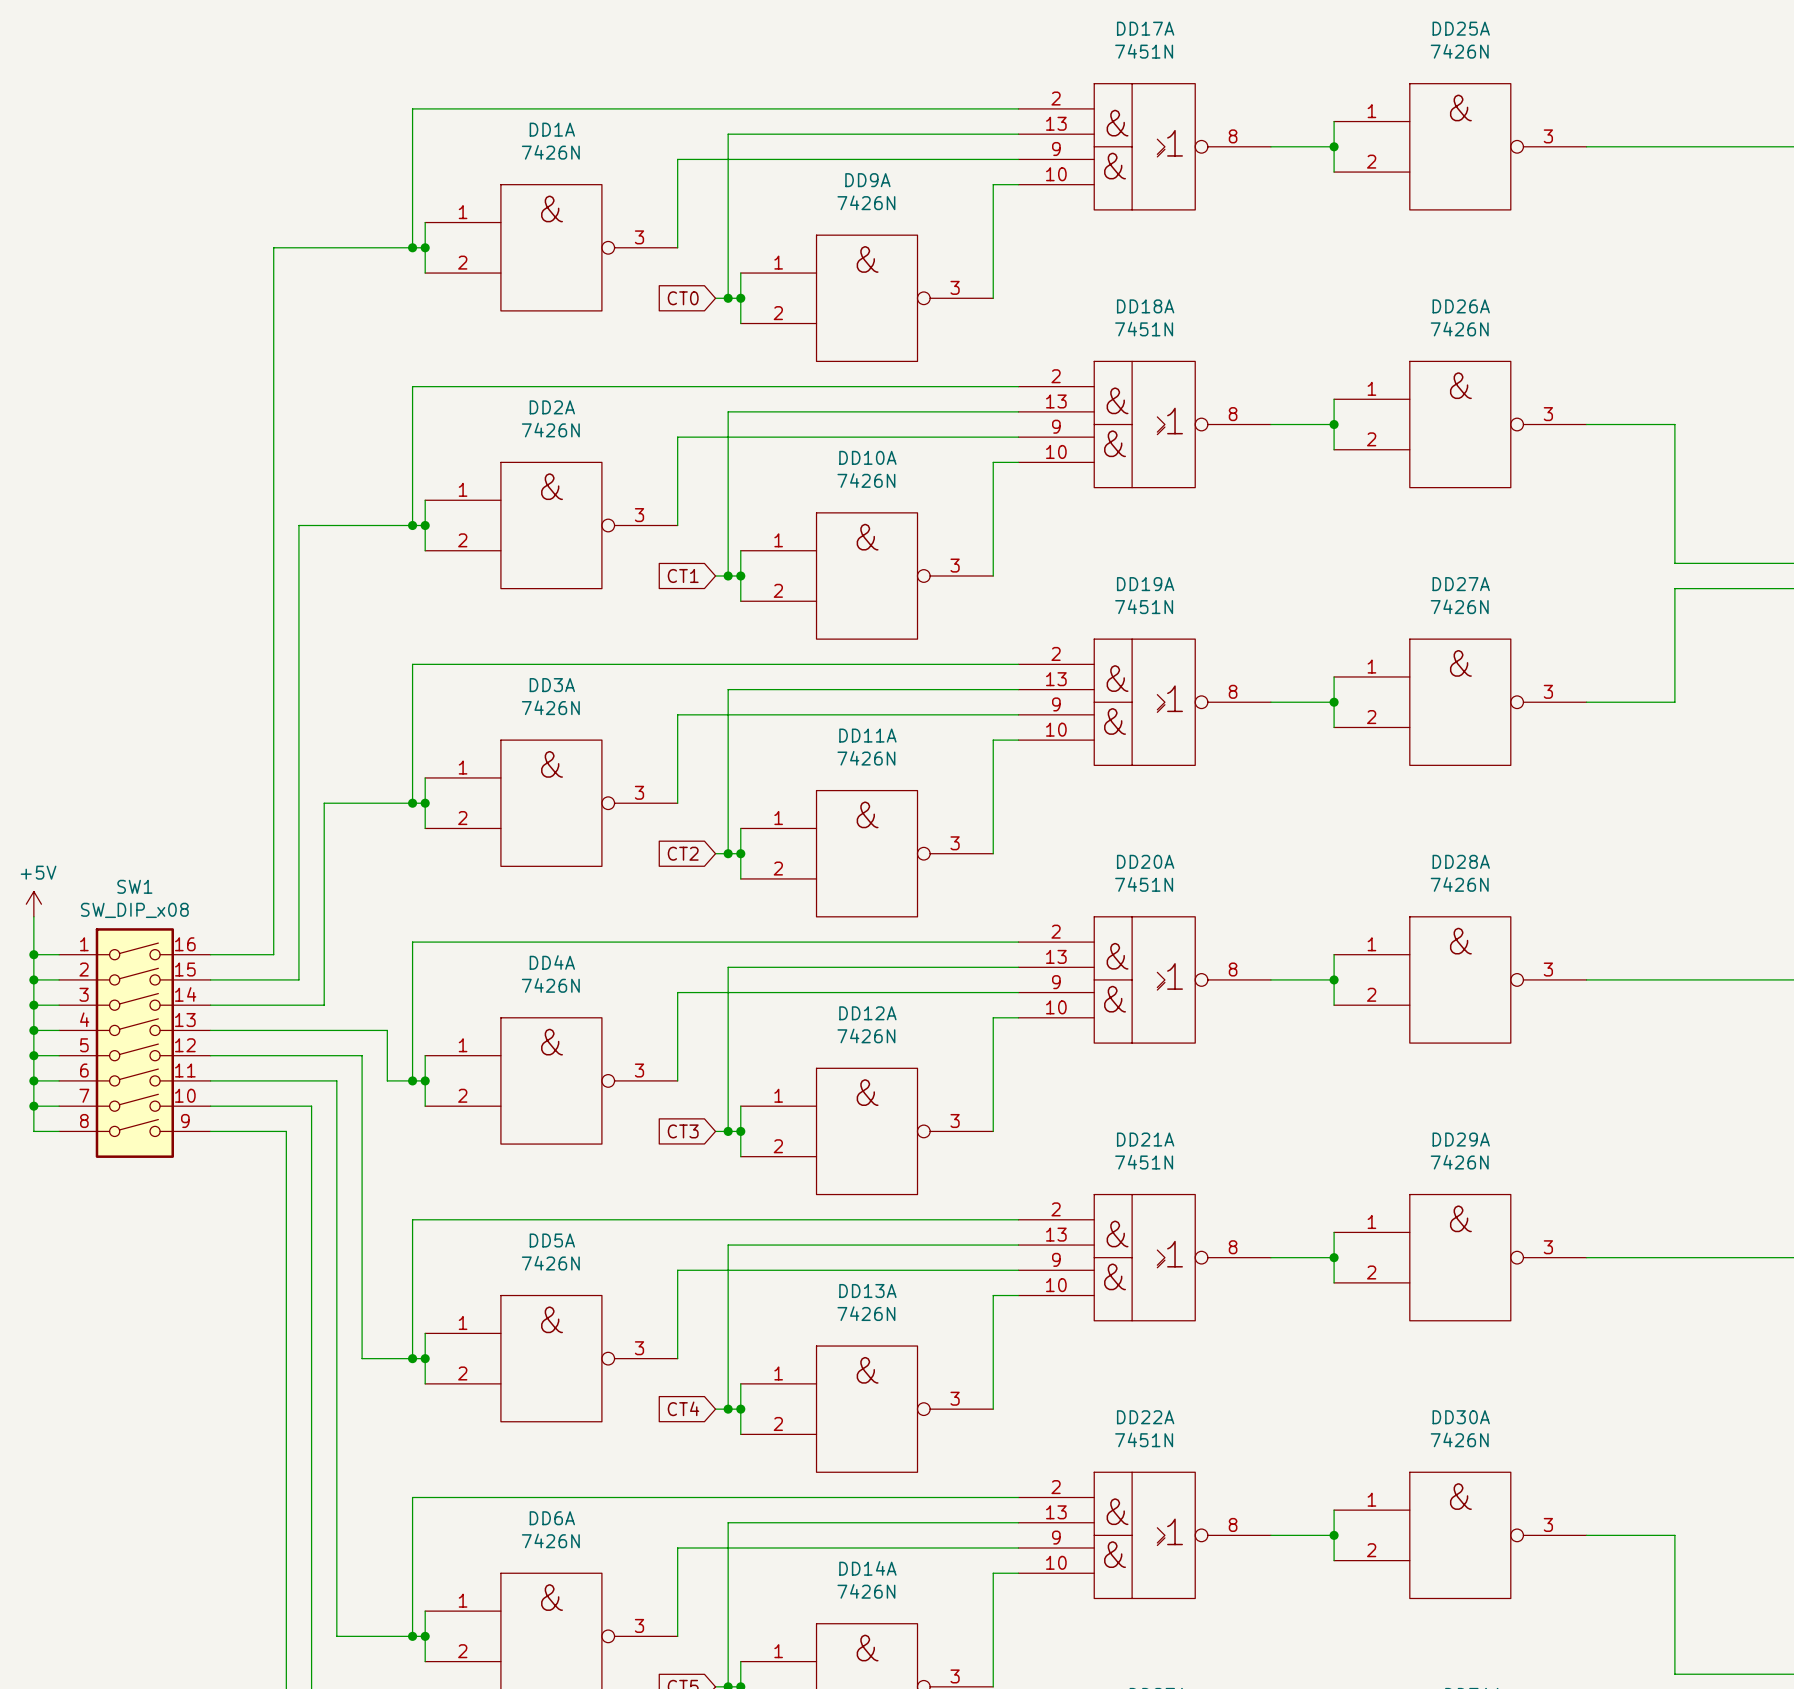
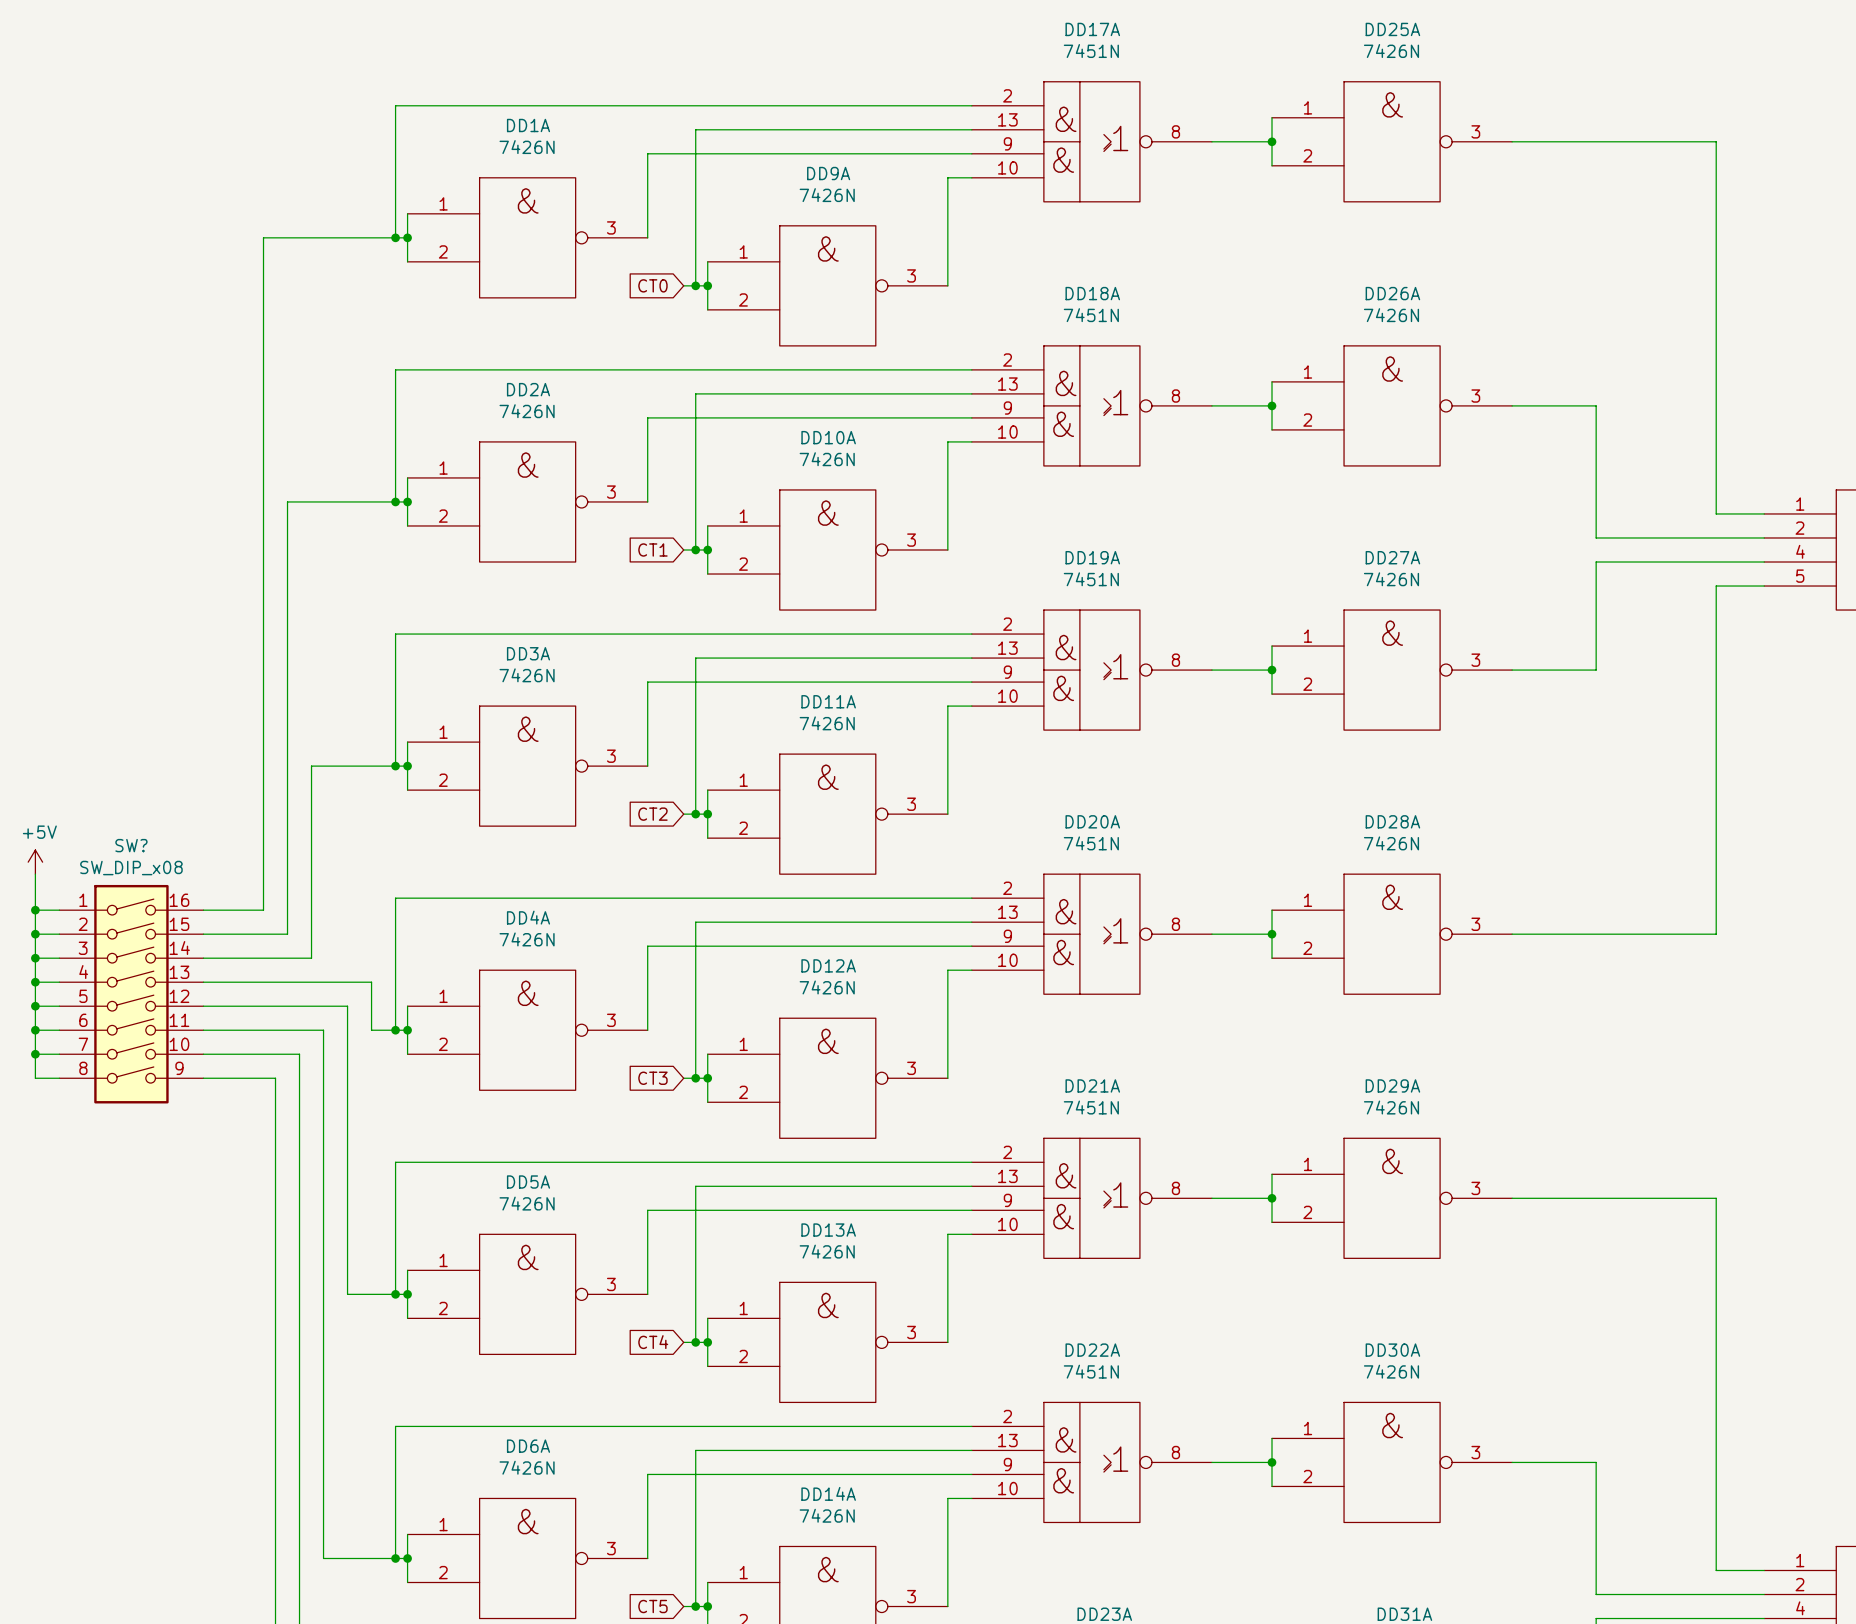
SW1 name: SW1 (134, 886) -> SW? (131, 845)

